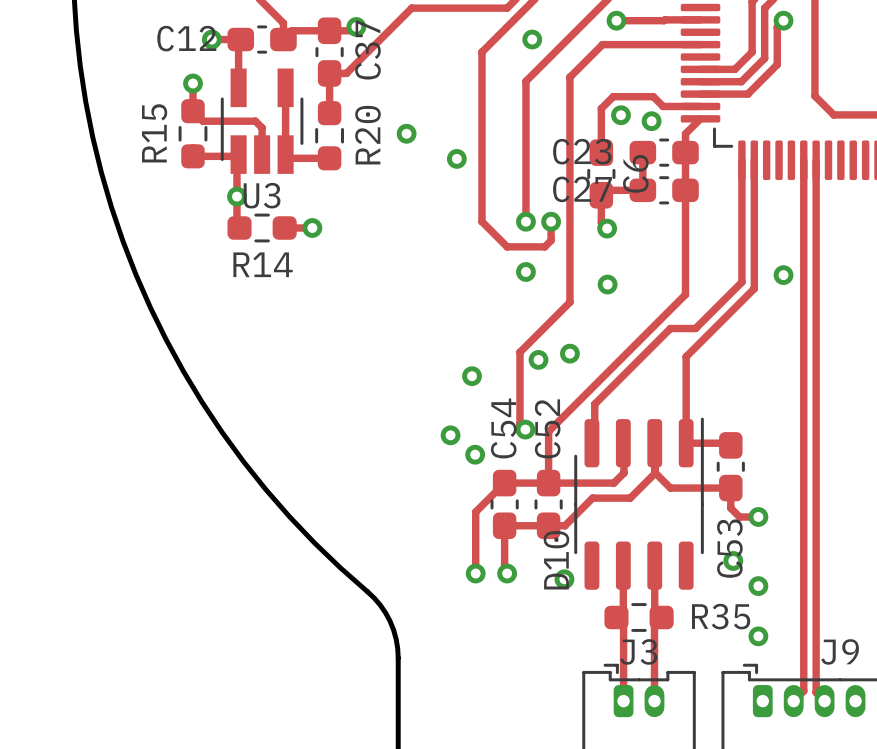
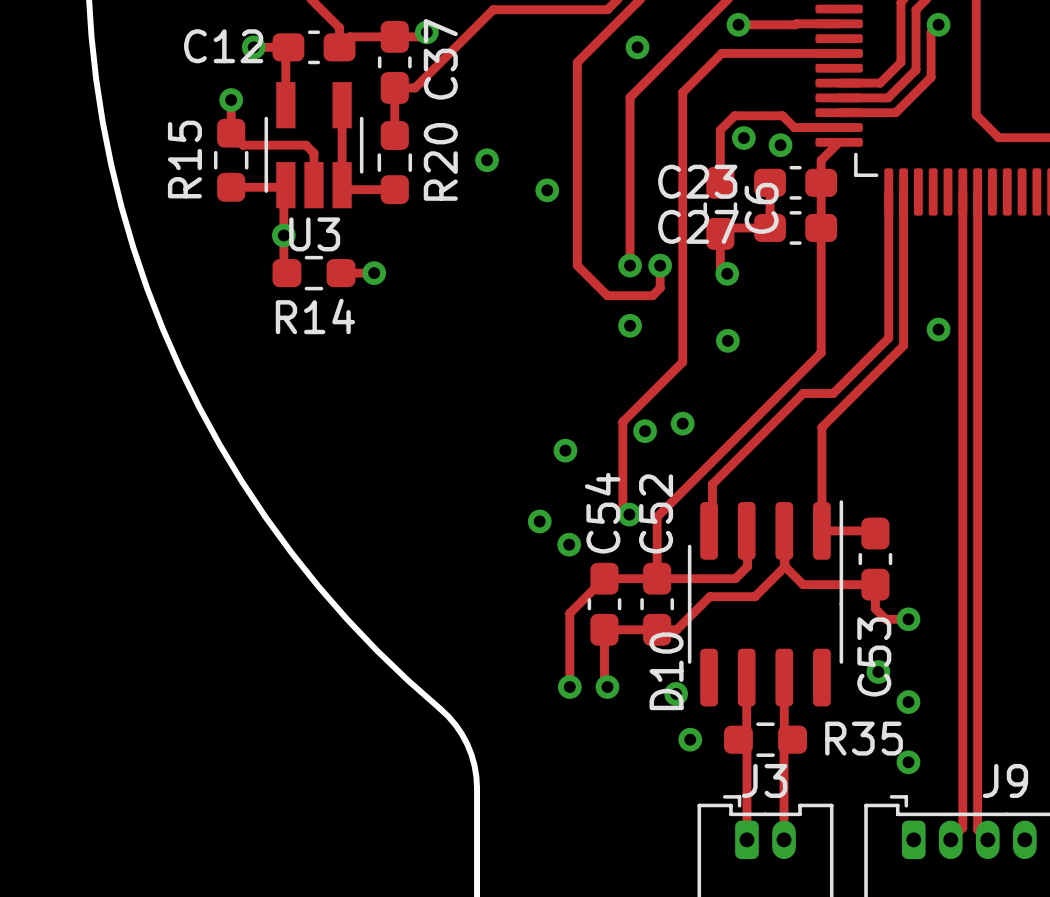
via: none -> (690, 739)

